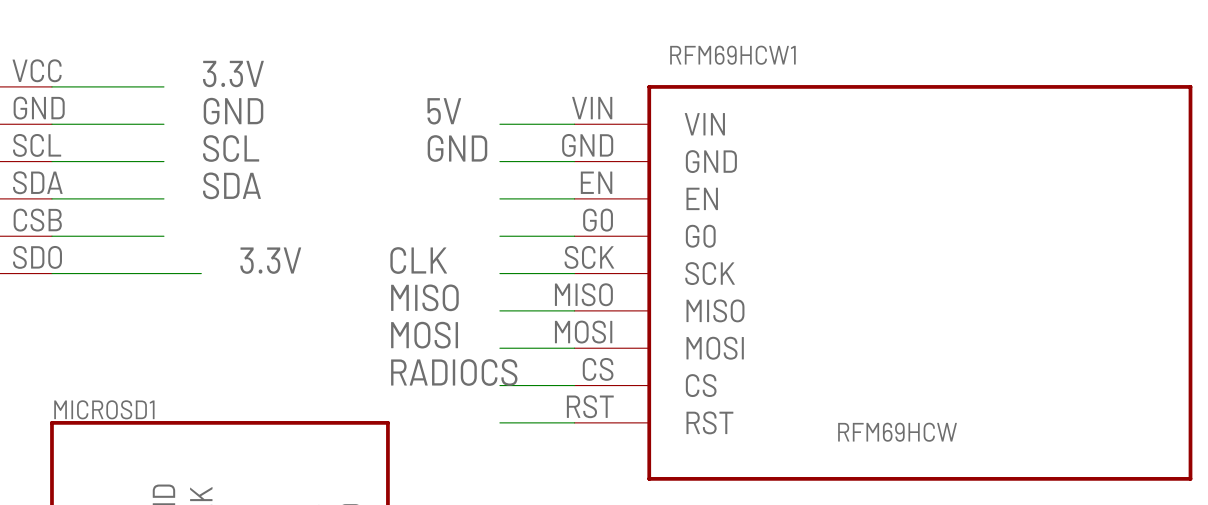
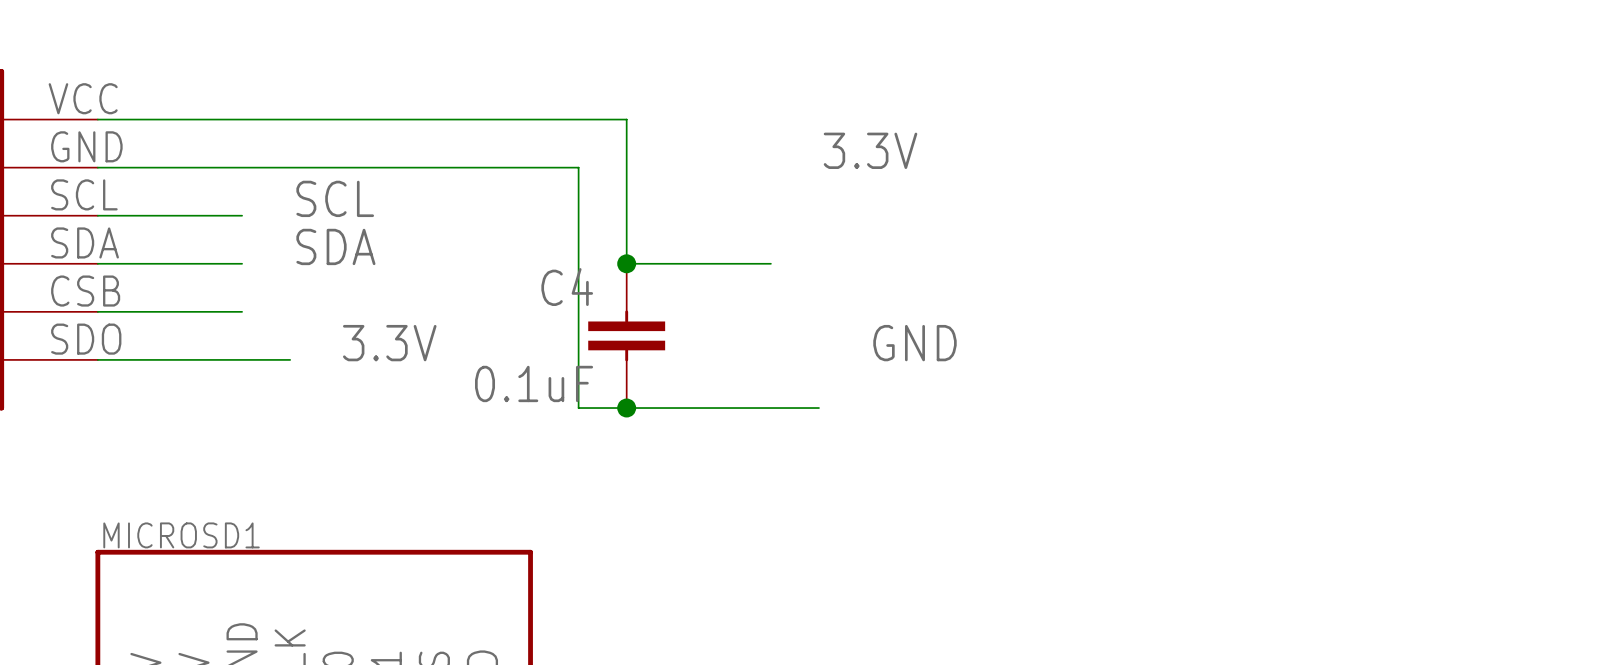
label: 3.3V (233, 74) -> none
wire: none -> (242, 119) (626, 119) (626, 263) (674, 263)
label: GND (233, 111) -> none
label: 5V (444, 111) -> none
label: none -> 3.3V (870, 150)
wire: none -> (242, 167) (578, 167) (578, 408) (674, 408)
wire: (499, 124) (574, 124) -> none
label: GND (457, 148) -> none
wire: (499, 161) (574, 161) -> none
junction: none -> (626, 263)
wire: (499, 236) (574, 236) -> none
C4: none -> 0.1uF (626, 335)
label: CLK (418, 260) -> none
label: none -> GND (914, 343)
wire: (499, 273) (574, 273) -> none
RFM69HCW1: RFM69HCW (883, 282) -> none
label: MISO (424, 297) -> none
junction: none -> (626, 408)
label: MOSI (424, 335) -> none
wire: (499, 348) (574, 348) -> none
label: RADIOCS (454, 372) -> none
wire: (499, 385) (574, 385) -> none
wire: (499, 422) (574, 422) -> none

